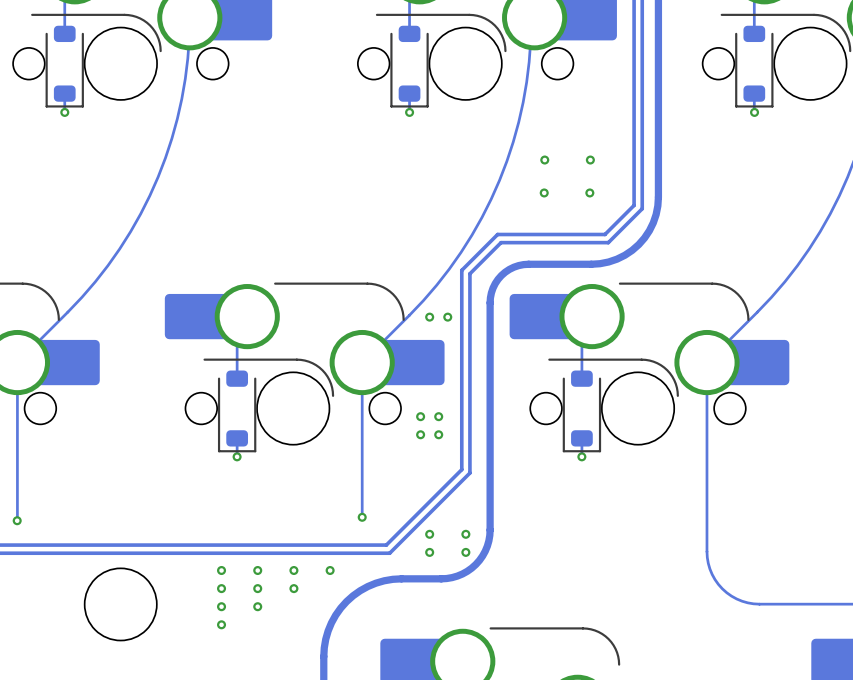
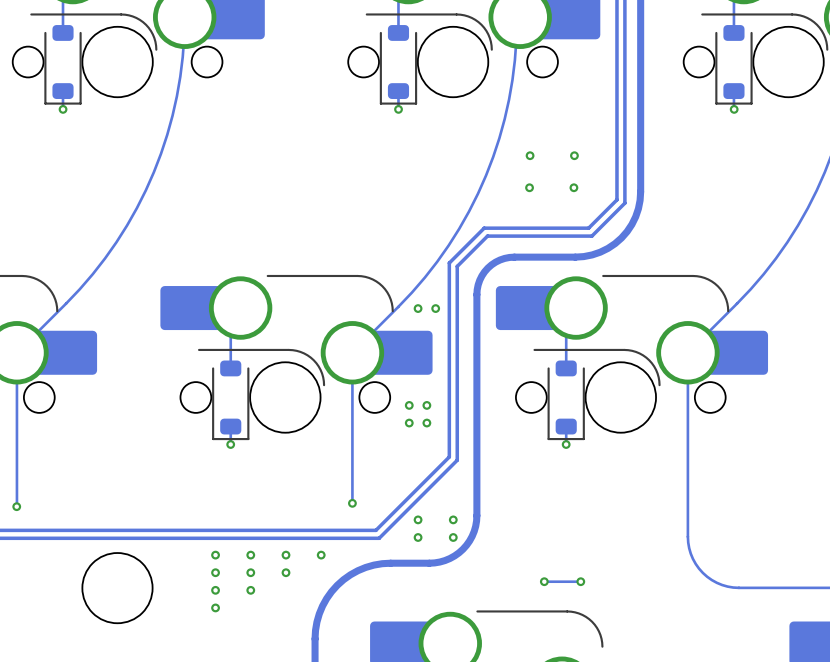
via: none -> (544, 581)
track: none -> (580, 581) (544, 581)
via: none -> (580, 581)

